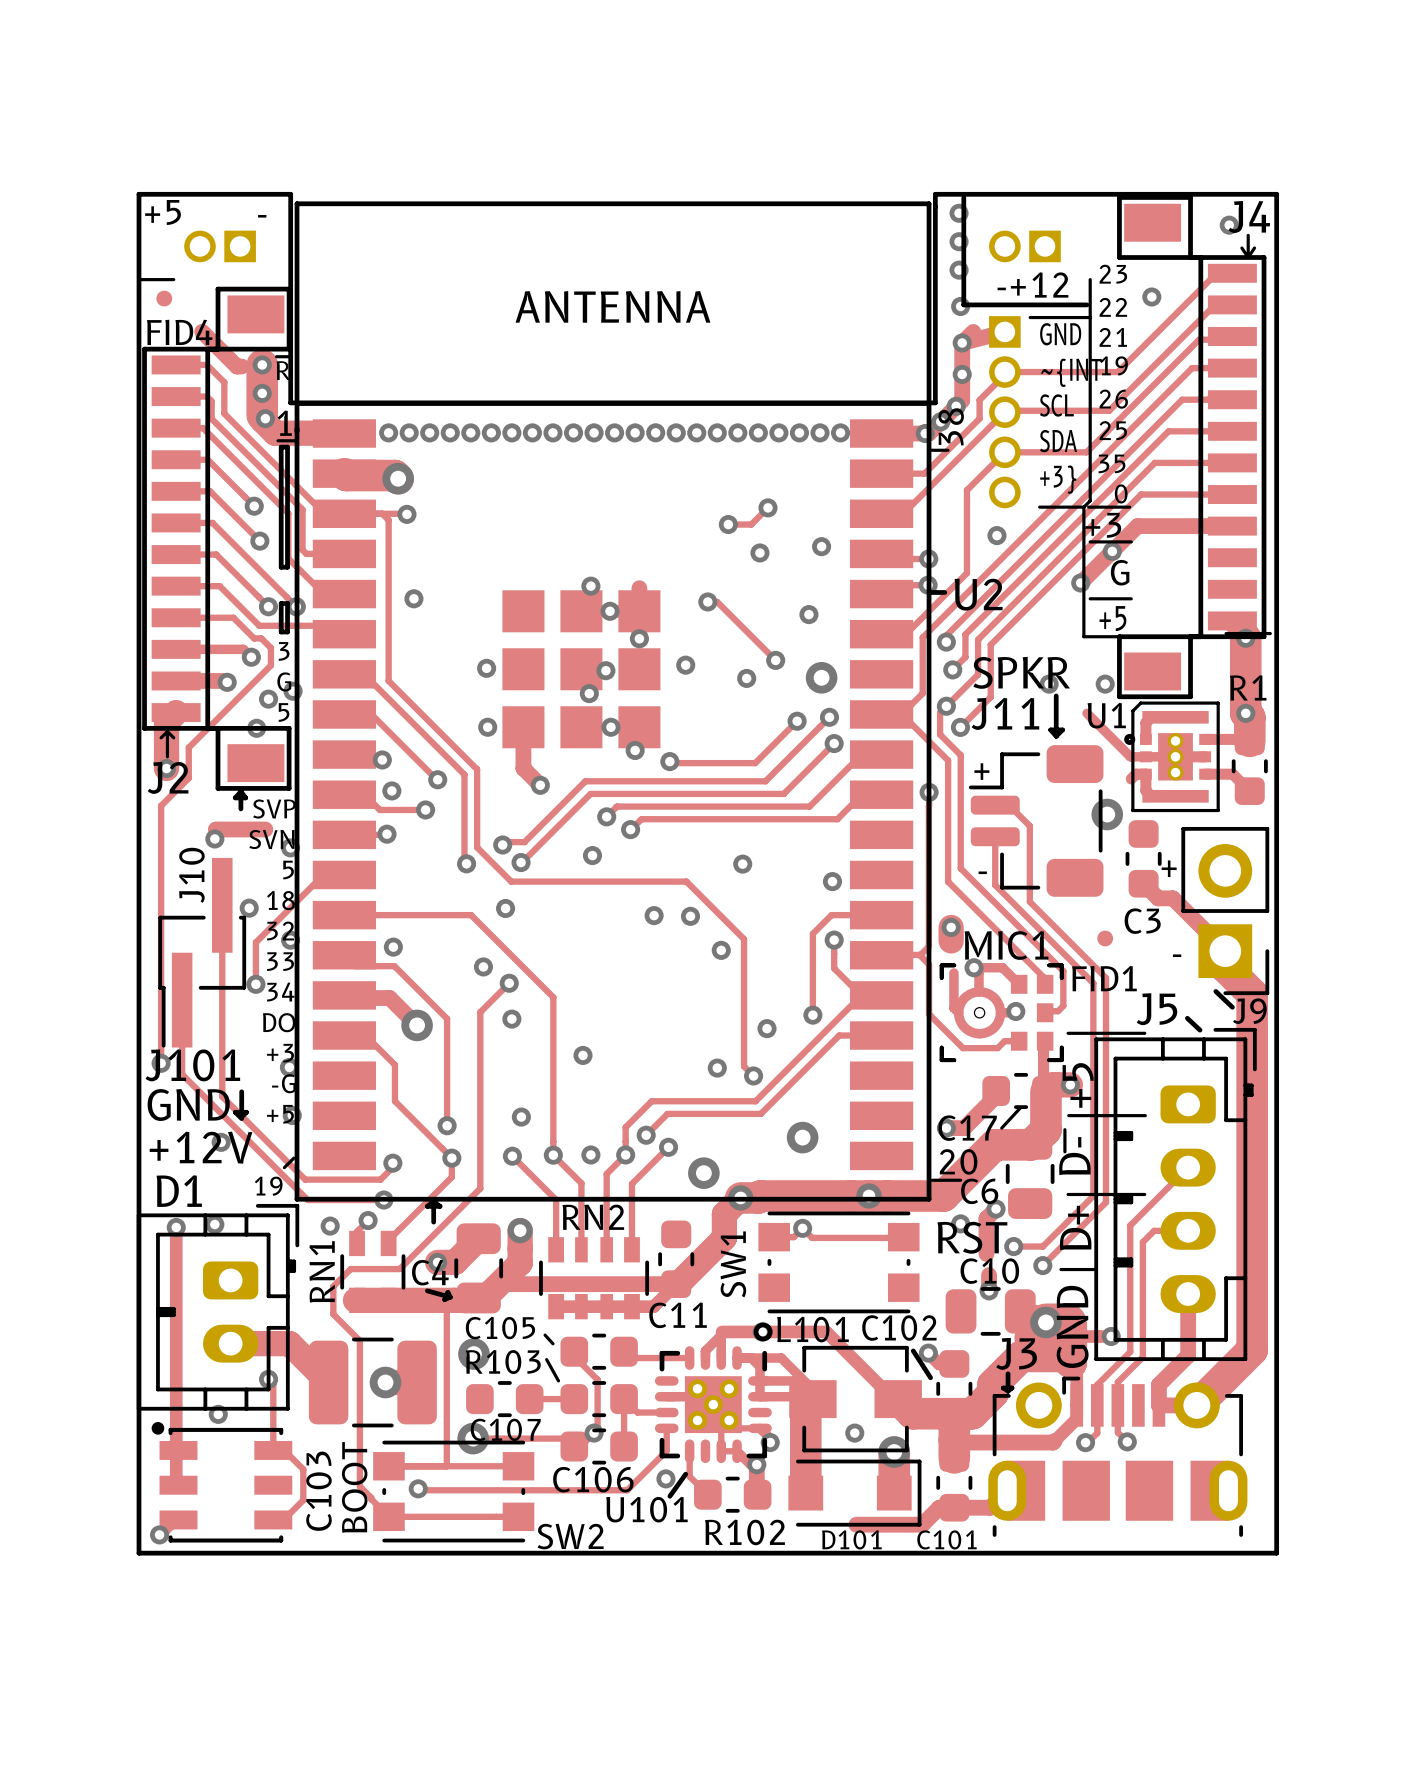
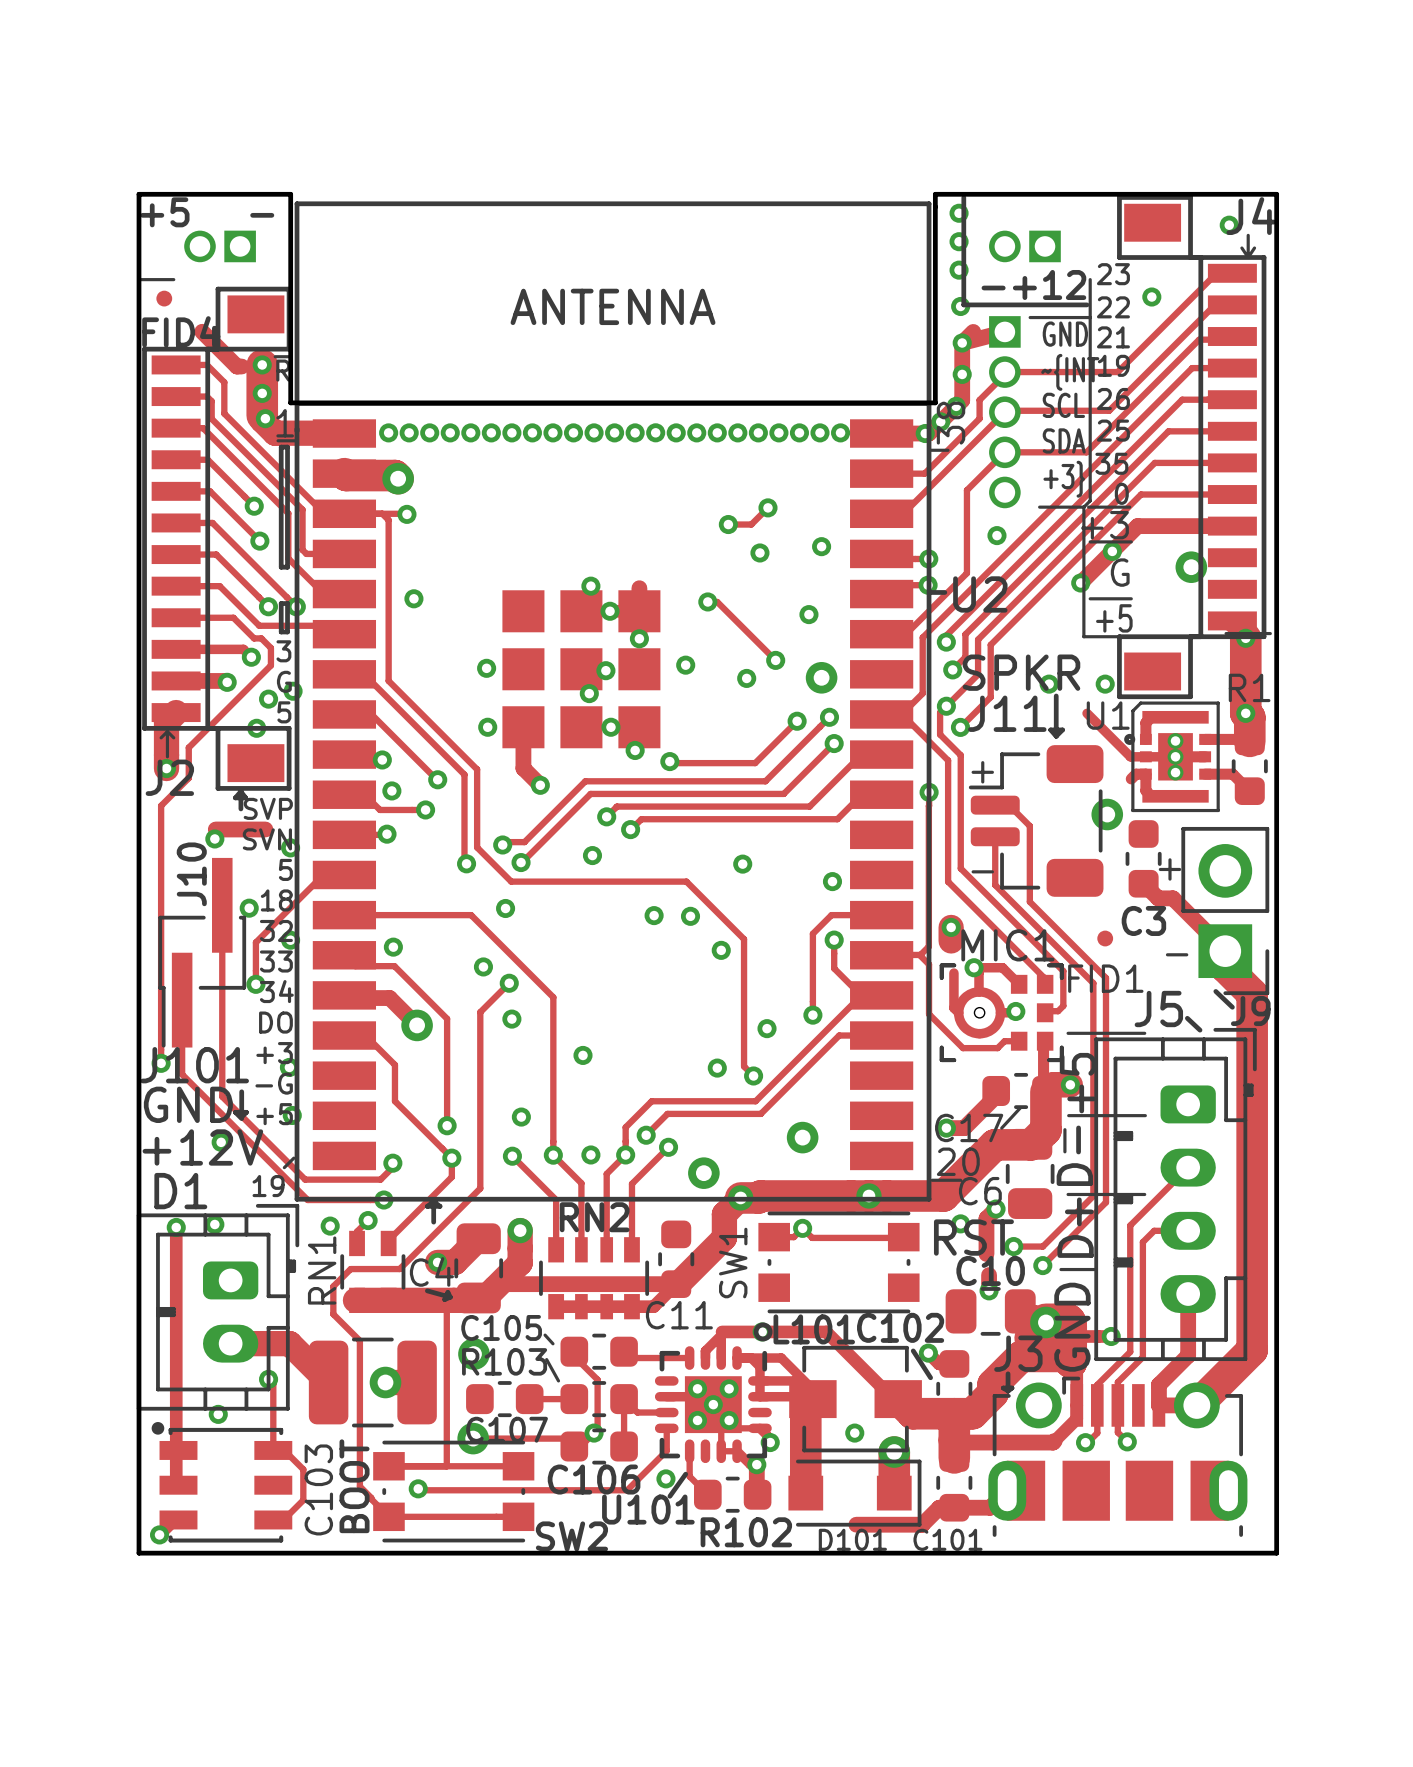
via: none -> (1191, 567)

